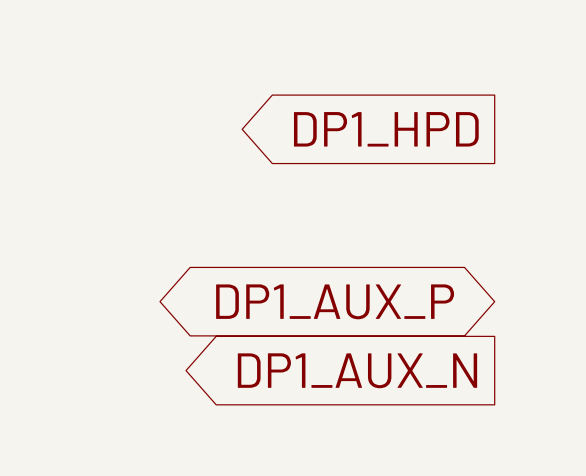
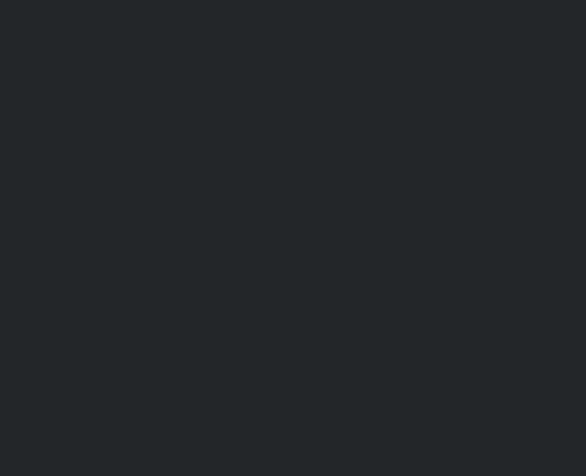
global label: DP1_HPD (386, 129) -> none
global label: DP1_AUX_P (335, 301) -> none
global label: DP1_AUX_N (357, 370) -> none

